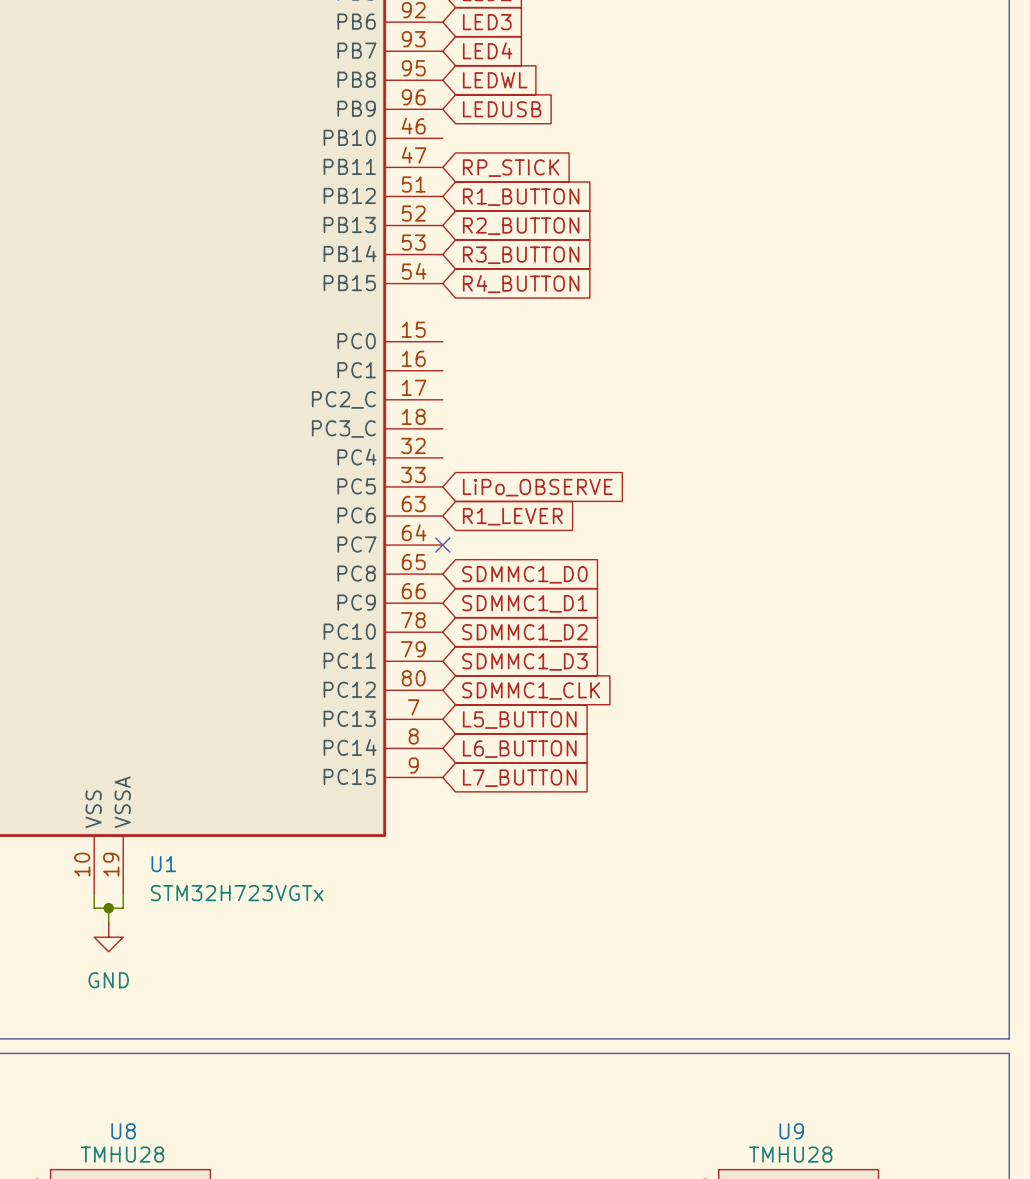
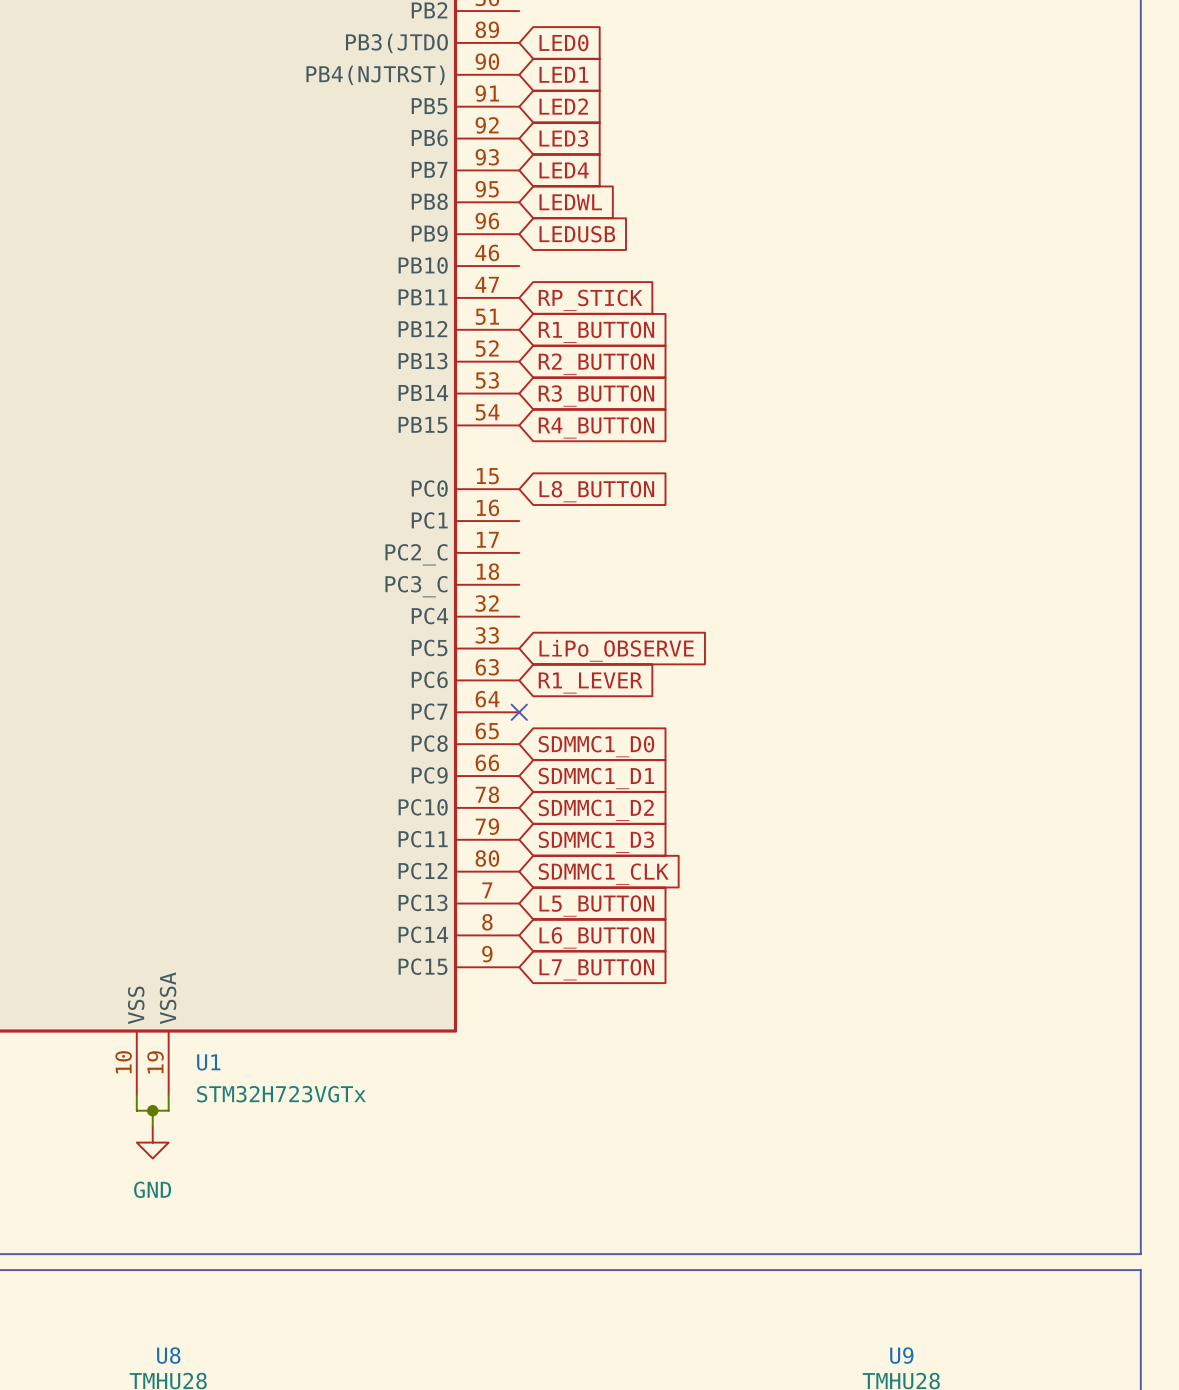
global label: none -> L8_BUTTON (596, 491)

